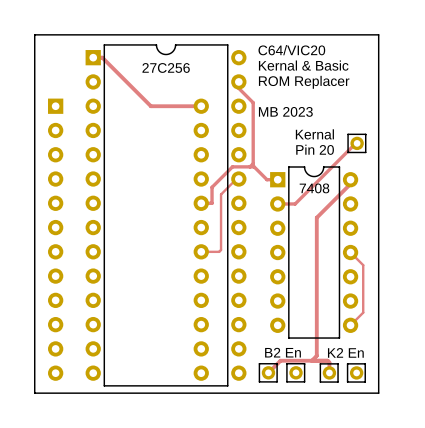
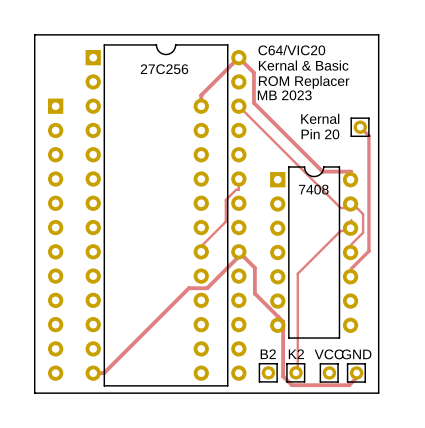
track: (93, 57) (102, 57) (150, 106) (201, 106) -> (351, 171) (322, 171) (253, 102) (253, 72) (238, 57) (201, 95) (201, 106)
27C256 name: 27C256 (166, 67) -> none
27C256 value: none -> 27C256 (164, 69)
track: (238, 81) (238, 88) (253, 102) (253, 163) (250, 166) -> none
track: none -> (238, 106) (340, 208) (357, 208) (363, 214) (363, 232) (351, 244)
text position: MB 2023 (285, 111) -> MB 2023 (284, 95)
track: none -> (360, 127) (368, 135) (368, 251) (351, 268)
text position: Kernal (314, 134) -> Kernal (320, 118)
part position: (356, 143) -> (360, 127)
track: (354, 144) (295, 203) (277, 203) -> none
text position: Pin 20 (315, 149) -> Pin 20 (320, 134)
track: (238, 179) (236, 179) (221, 194) (221, 250) (219, 251) (201, 251) -> (238, 179) (238, 189) (236, 189) (225, 200) (225, 221) (201, 246) (201, 251)
track: (277, 179) (266, 179) (254, 166) (232, 166) (212, 187) (212, 203) (201, 203) -> none
track: (350, 179) (350, 183) (316, 217) (316, 355) (311, 360) -> none
7408 name: 7408 (314, 188) -> none
7408 value: none -> 7408 (313, 189)
track: none -> (351, 220) (351, 230) (340, 230) (297, 273) (297, 374)
track: (350, 252) (363, 265) (363, 312) (350, 325) -> none
B2 En name: B2 En (283, 352) -> B2 (268, 354)
K2 En name: K2 En (345, 352) -> none
K2 name: none -> K2 (296, 354)
K2 En value: none -> VCC (329, 354)
part value: none -> GND (356, 354)
track: (268, 372) (280, 360) (327, 360) (329, 372) -> none
track: none -> (93, 373) (103, 373) (188, 288) (207, 288) (238, 256) (238, 251) (254, 267) (254, 293) (283, 321) (283, 376) (291, 385) (349, 385) (360, 374)

